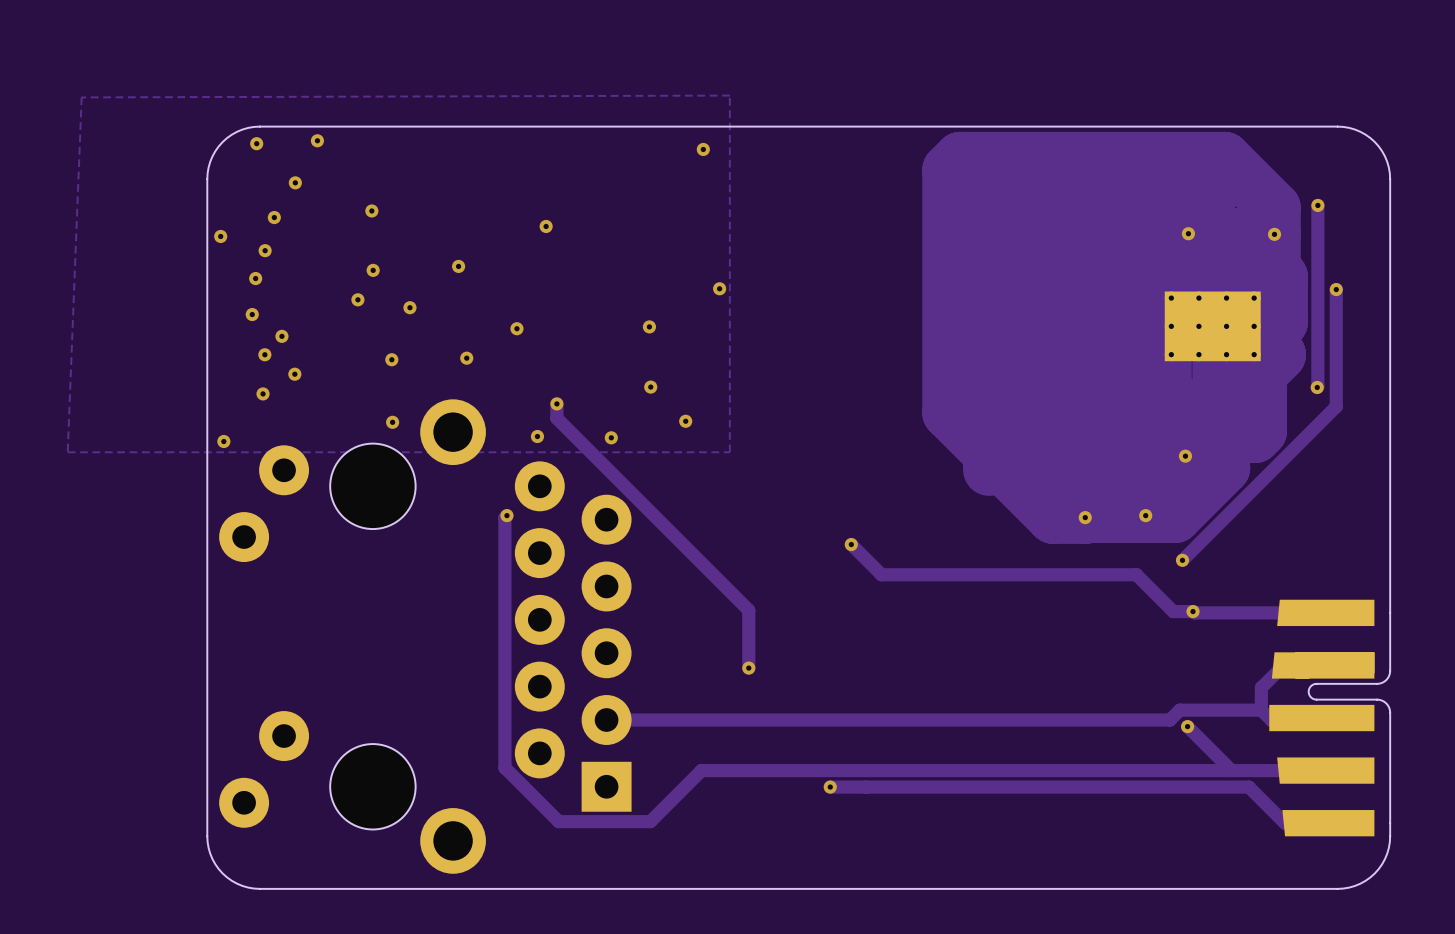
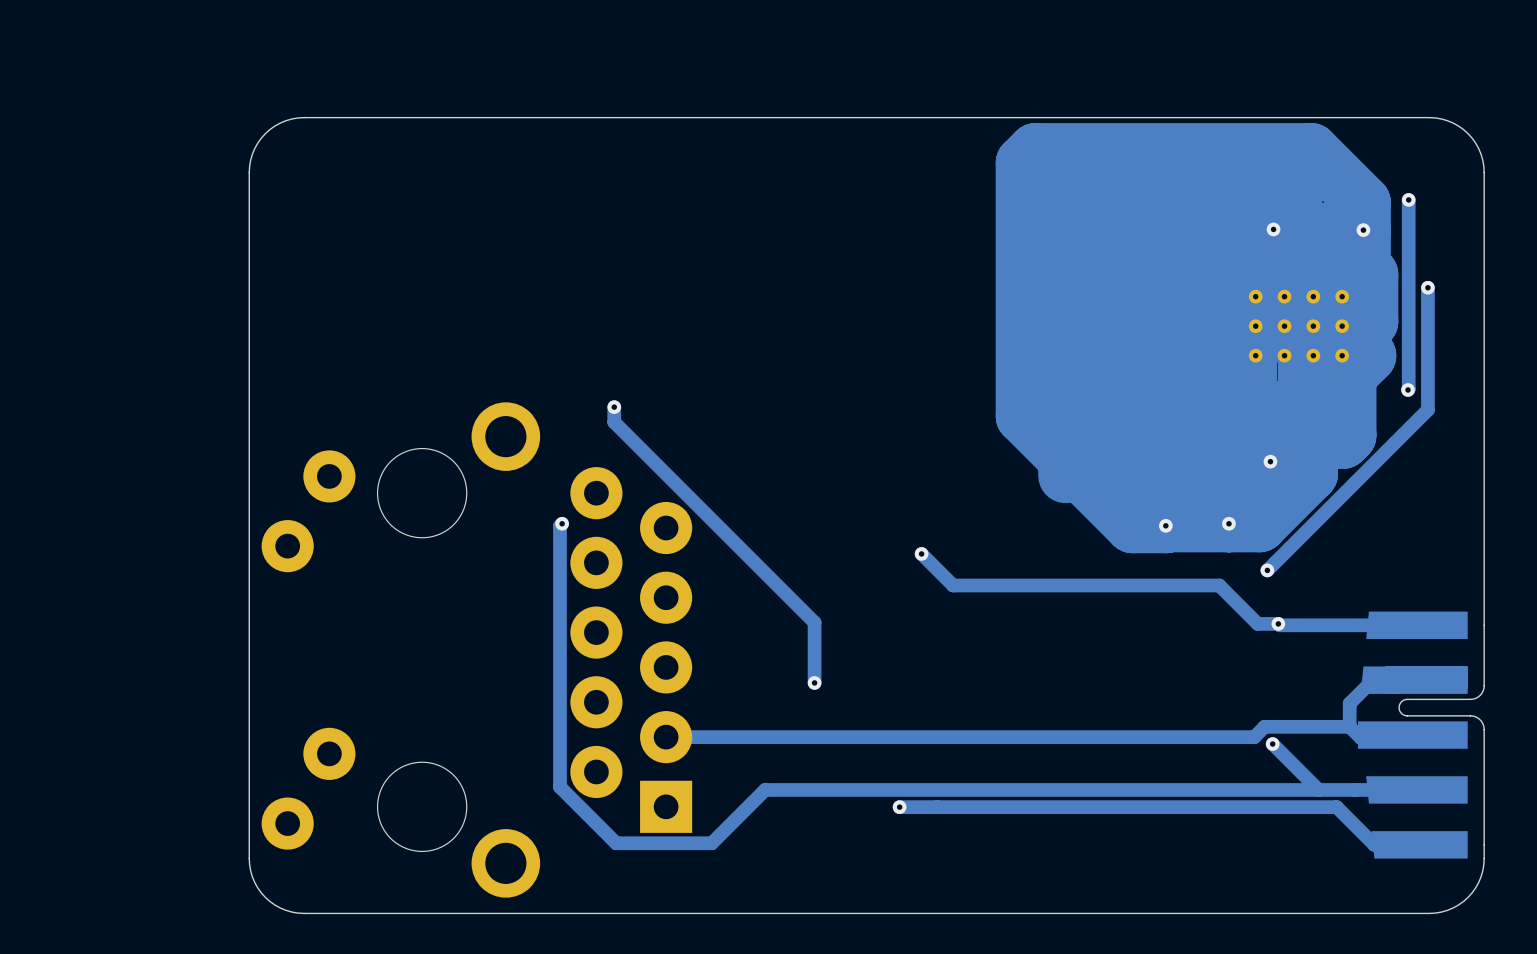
zone outline: (729, 95) (729, 452) (67, 452) (81, 97) (729, 95) -> none
via: (317, 140) -> none
via: (256, 143) -> none
via: (703, 149) -> none
via: (295, 182) -> none
via: (371, 210) -> none
via: (274, 217) -> none
via: (546, 226) -> none
via: (220, 236) -> none
via: (265, 250) -> none
via: (458, 266) -> none
via: (373, 270) -> none
via: (255, 278) -> none
via: (719, 288) -> none
via: (357, 299) -> none
via: (409, 307) -> none
via: (252, 314) -> none
via: (649, 326) -> none
via: (516, 328) -> none
via: (281, 336) -> none
via: (264, 354) -> none
via: (466, 358) -> none
via: (391, 359) -> none
via: (294, 374) -> none
via: (650, 387) -> none
via: (263, 393) -> none
via: (685, 421) -> none
via: (392, 422) -> none
via: (537, 436) -> none
via: (611, 437) -> none
via: (223, 441) -> none

